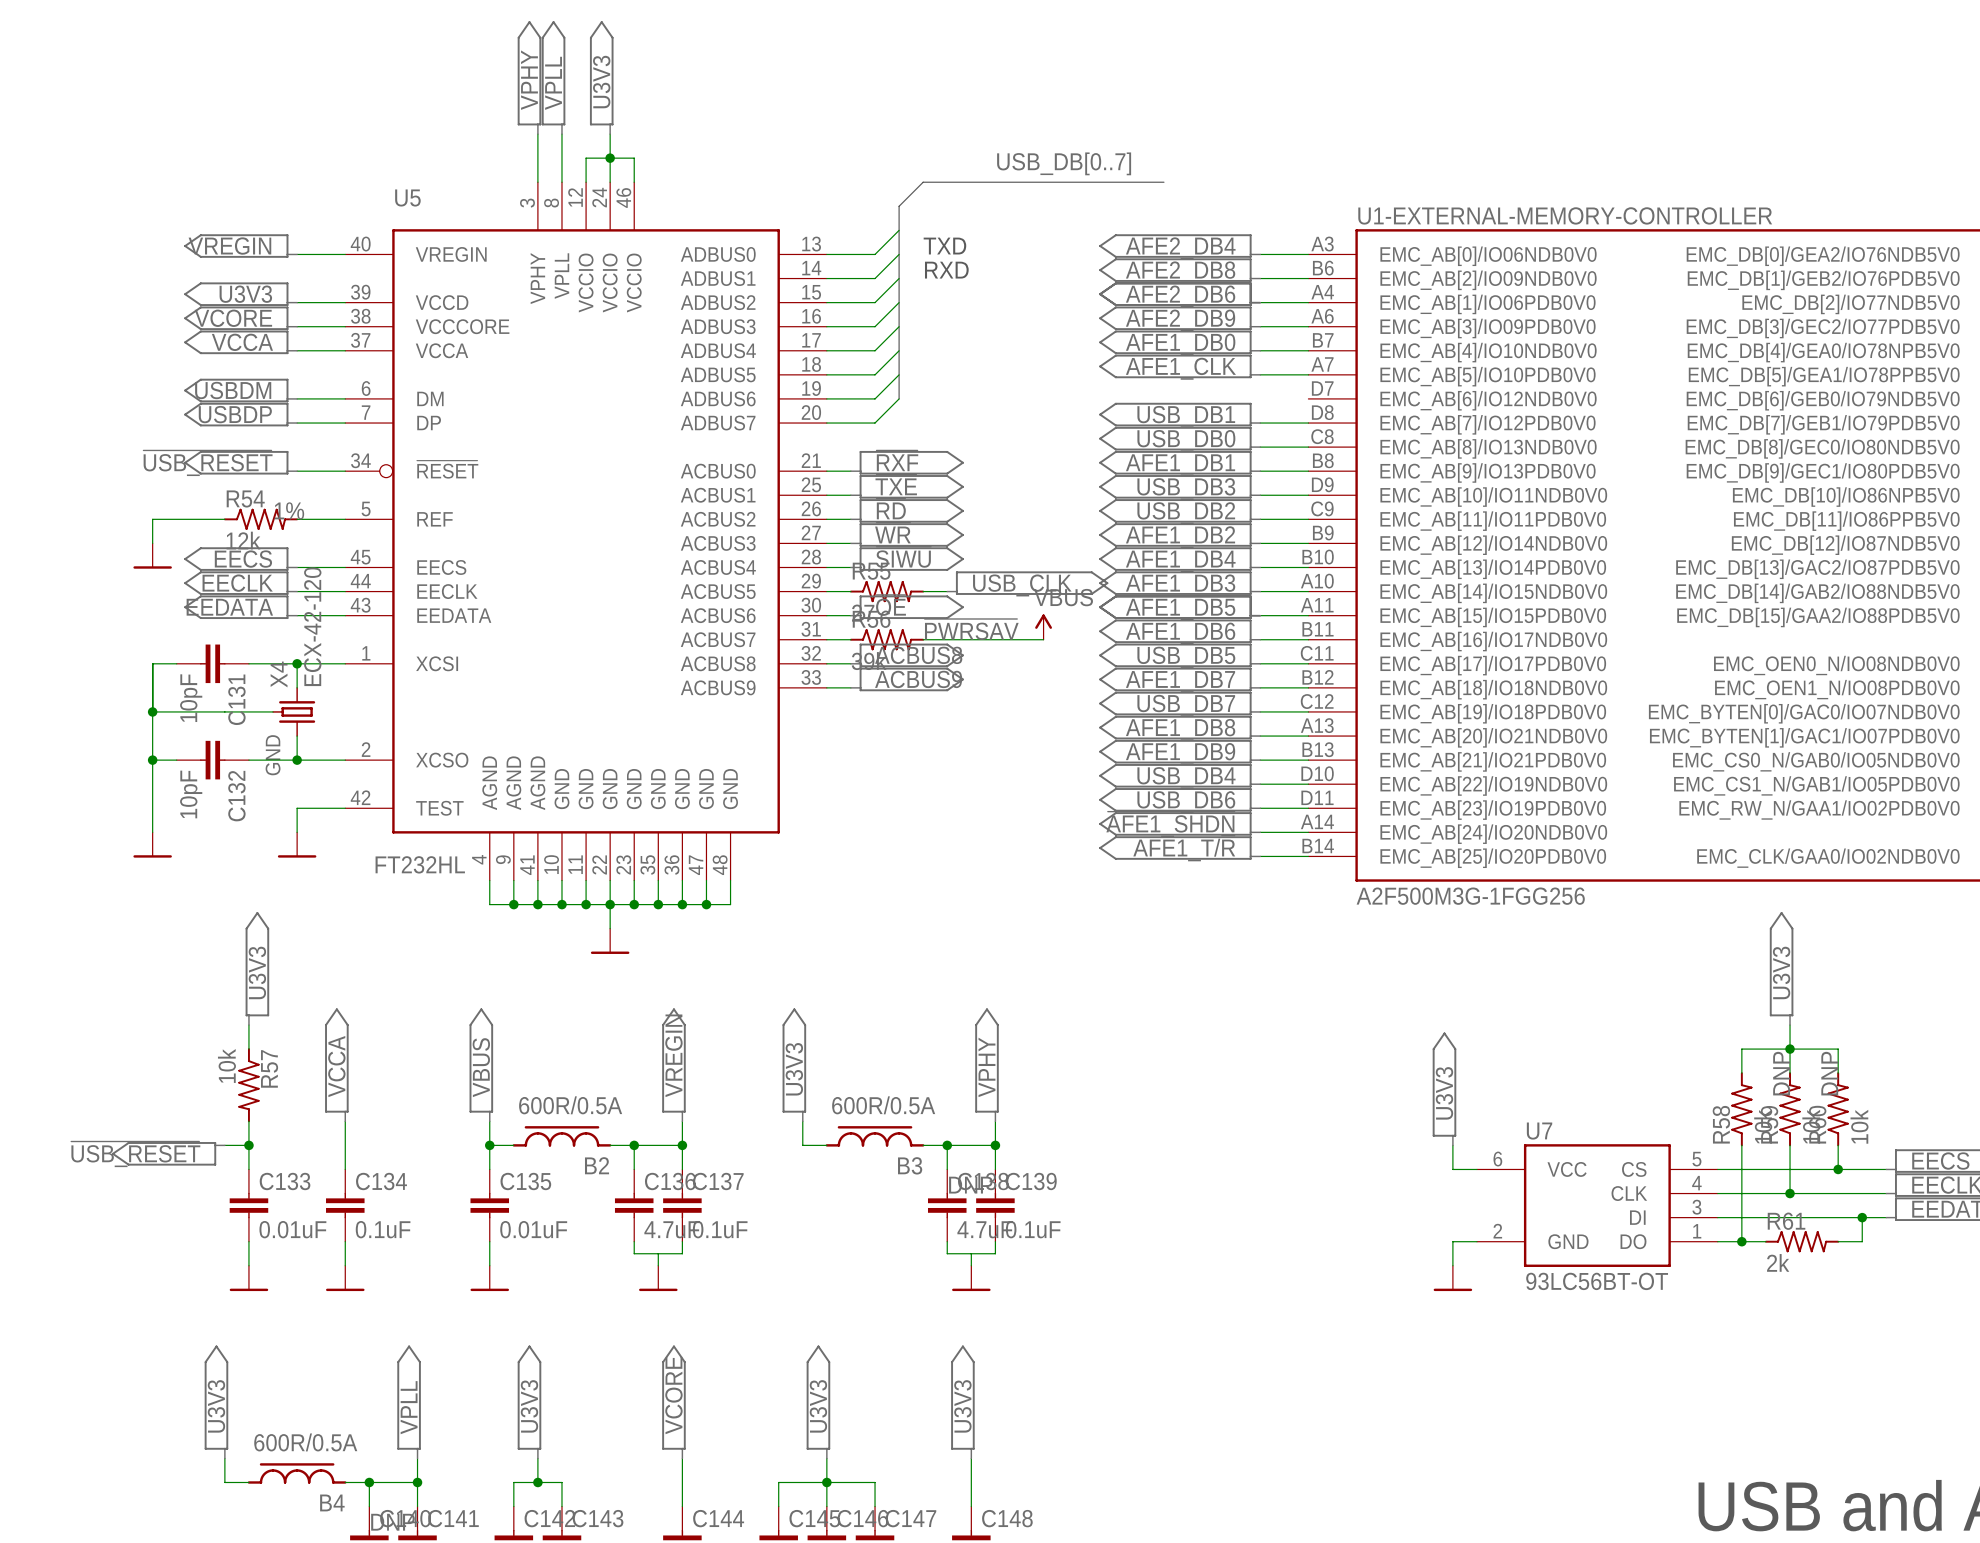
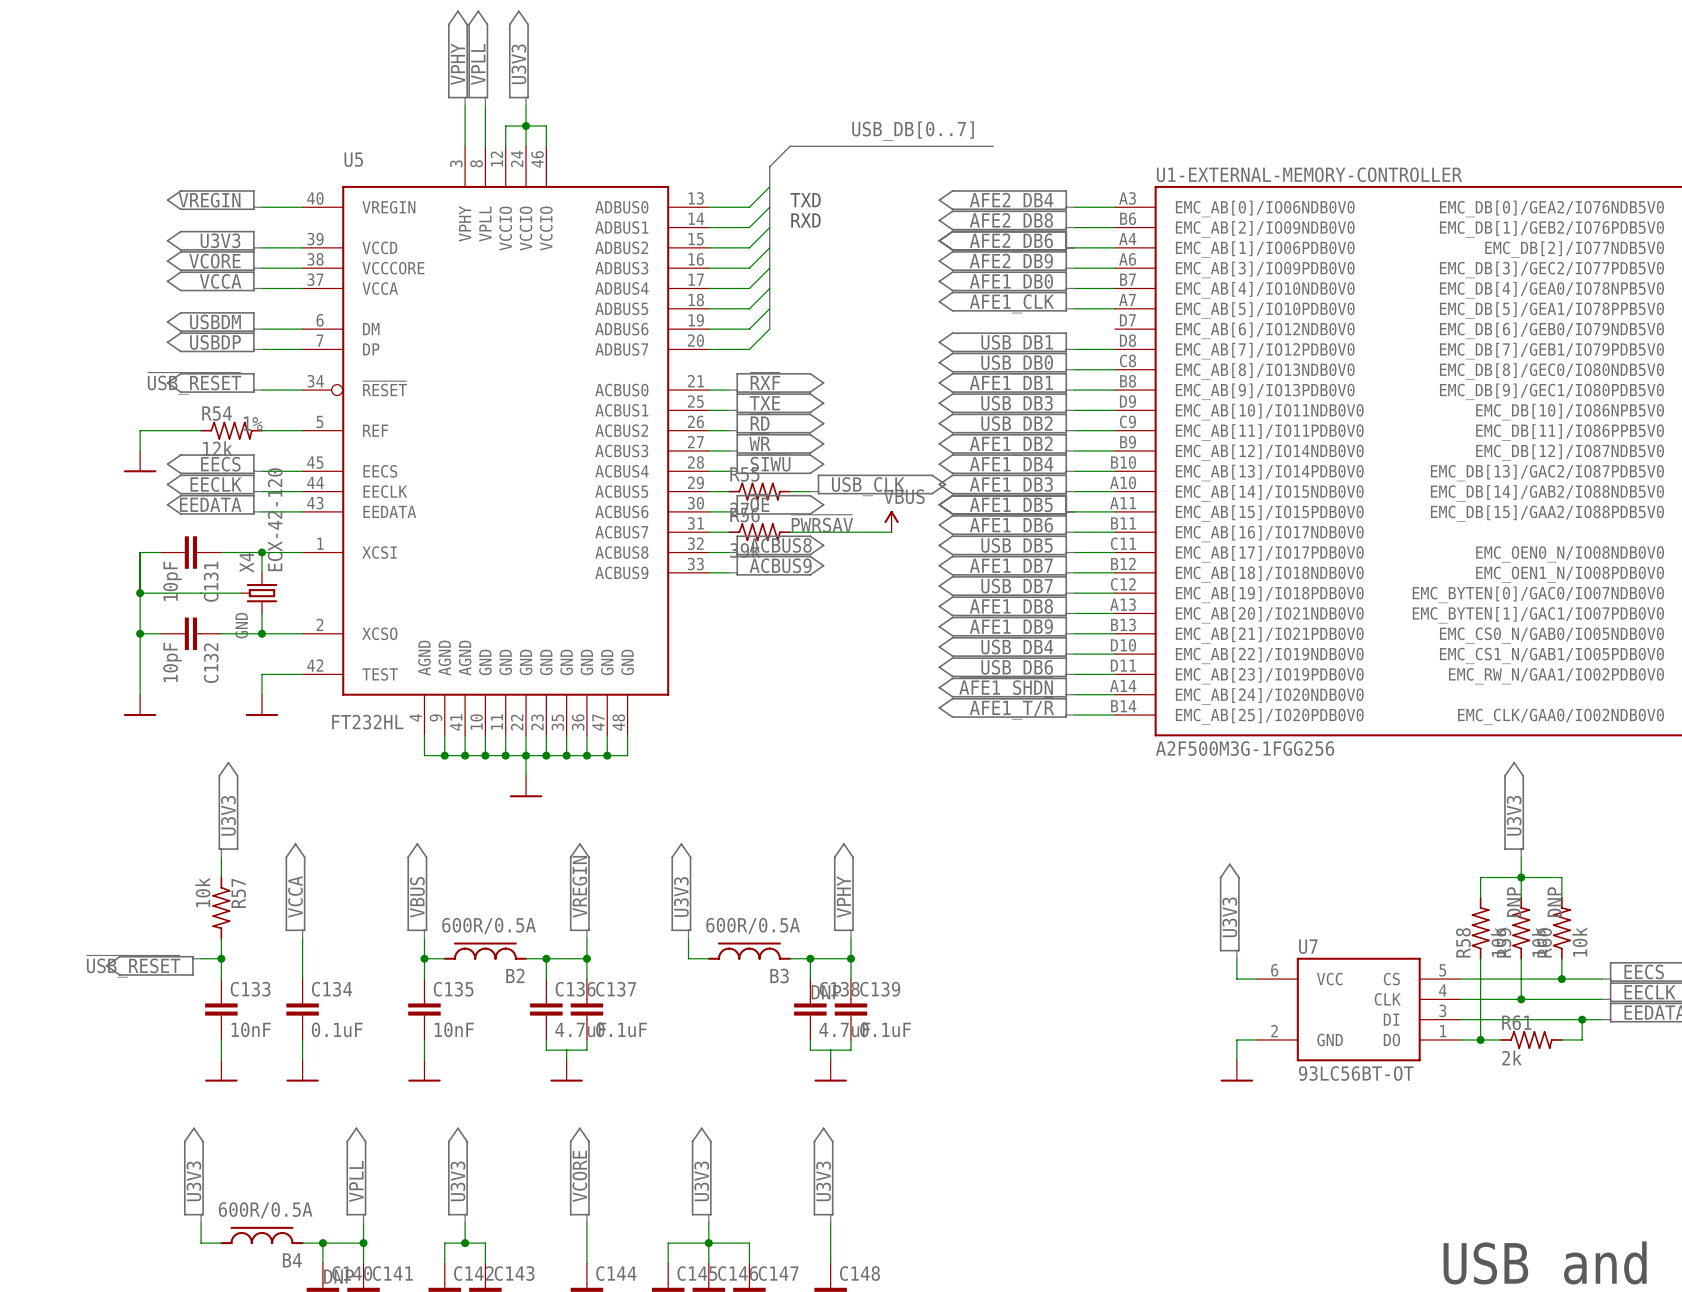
C133 value: 0.01uF (292, 1229) -> 10nF (251, 1029)
C135 value: 0.01uF (533, 1229) -> 10nF (454, 1029)

